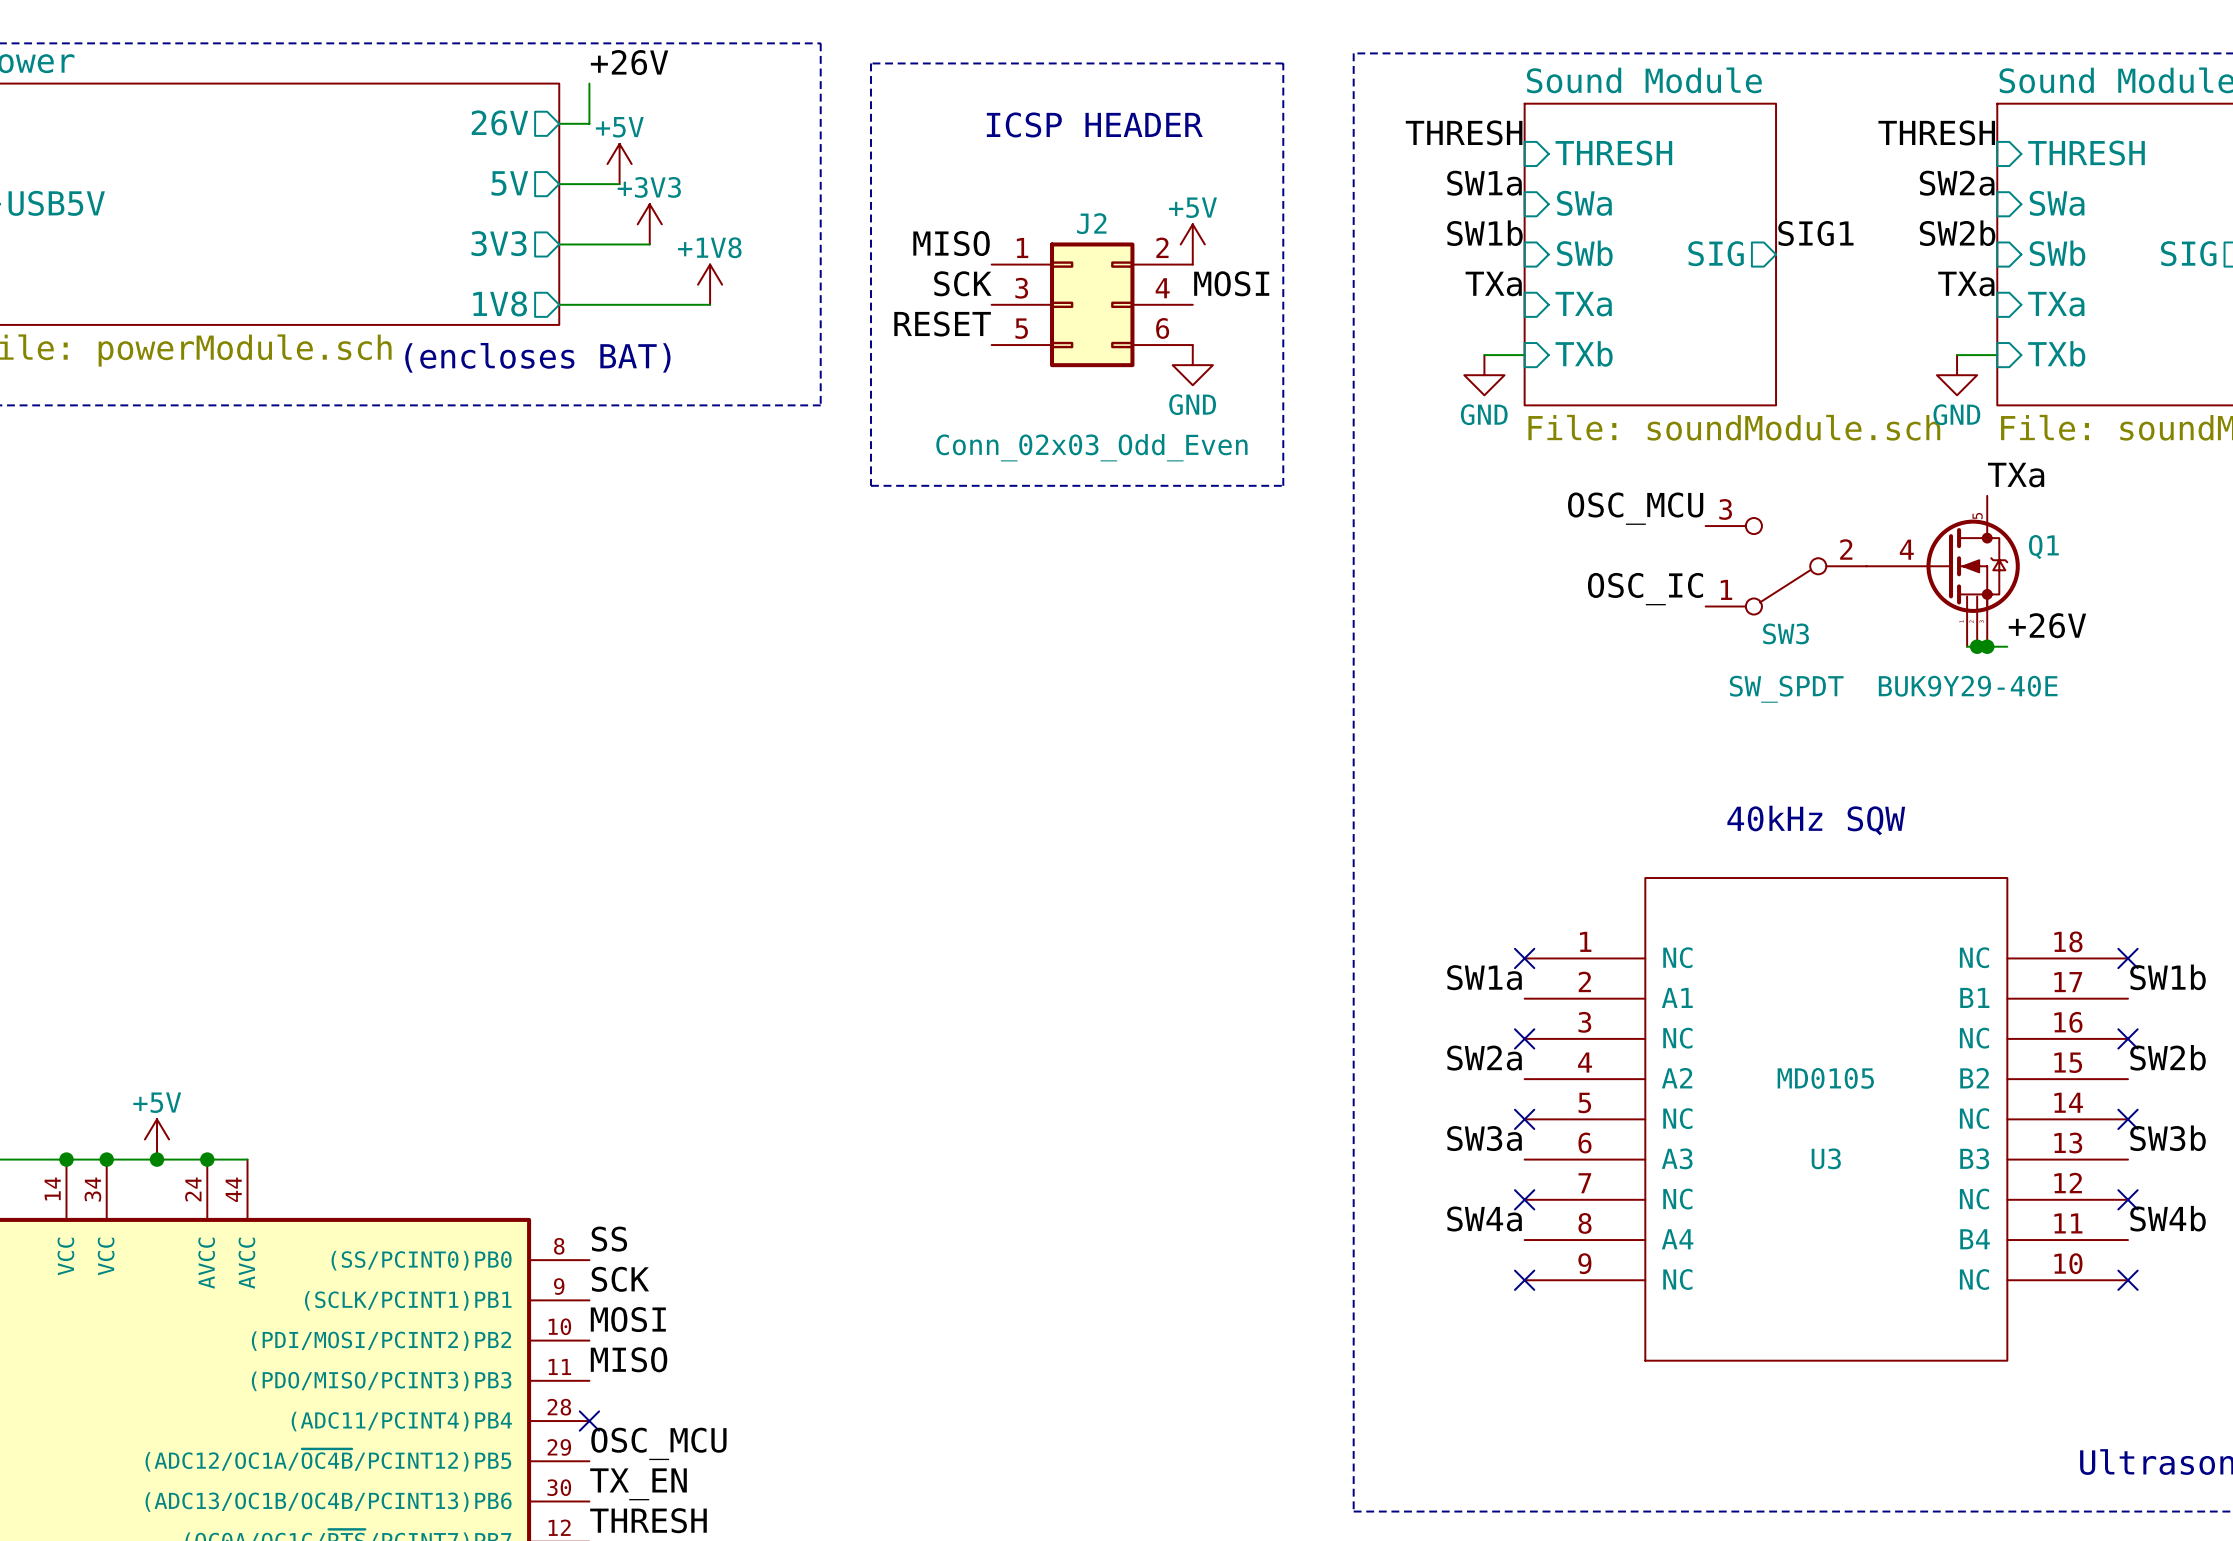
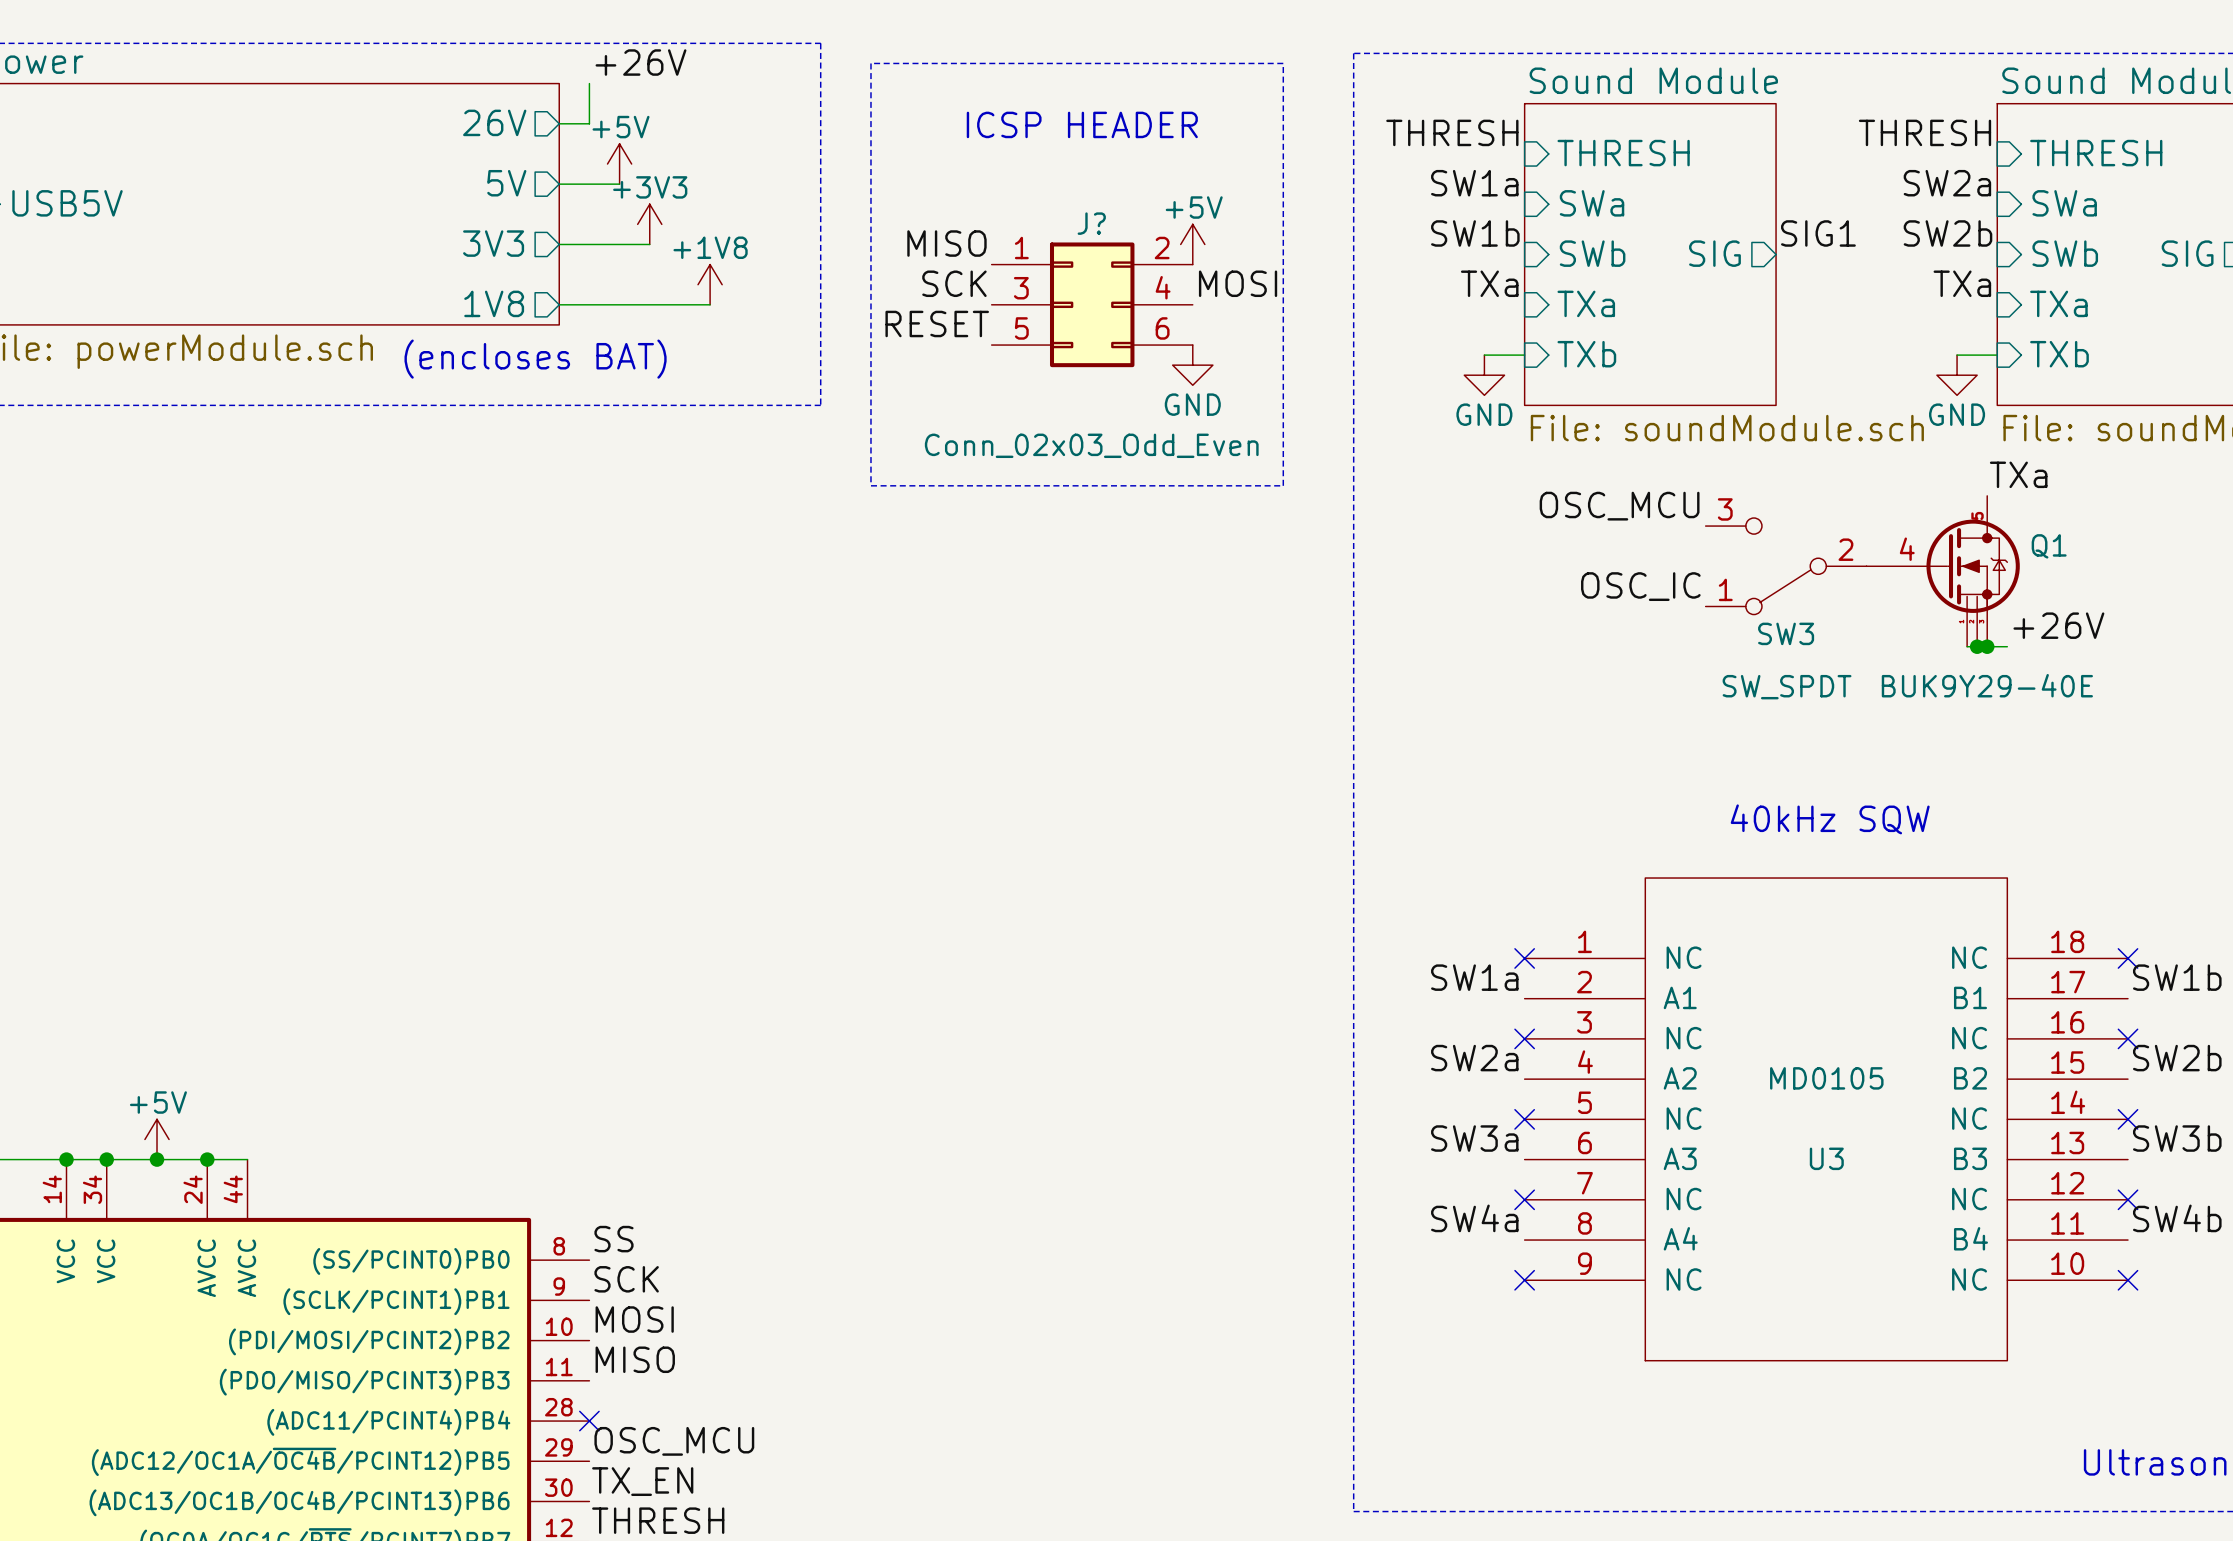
J2 name: J2 (1091, 223) -> J? (1091, 223)

